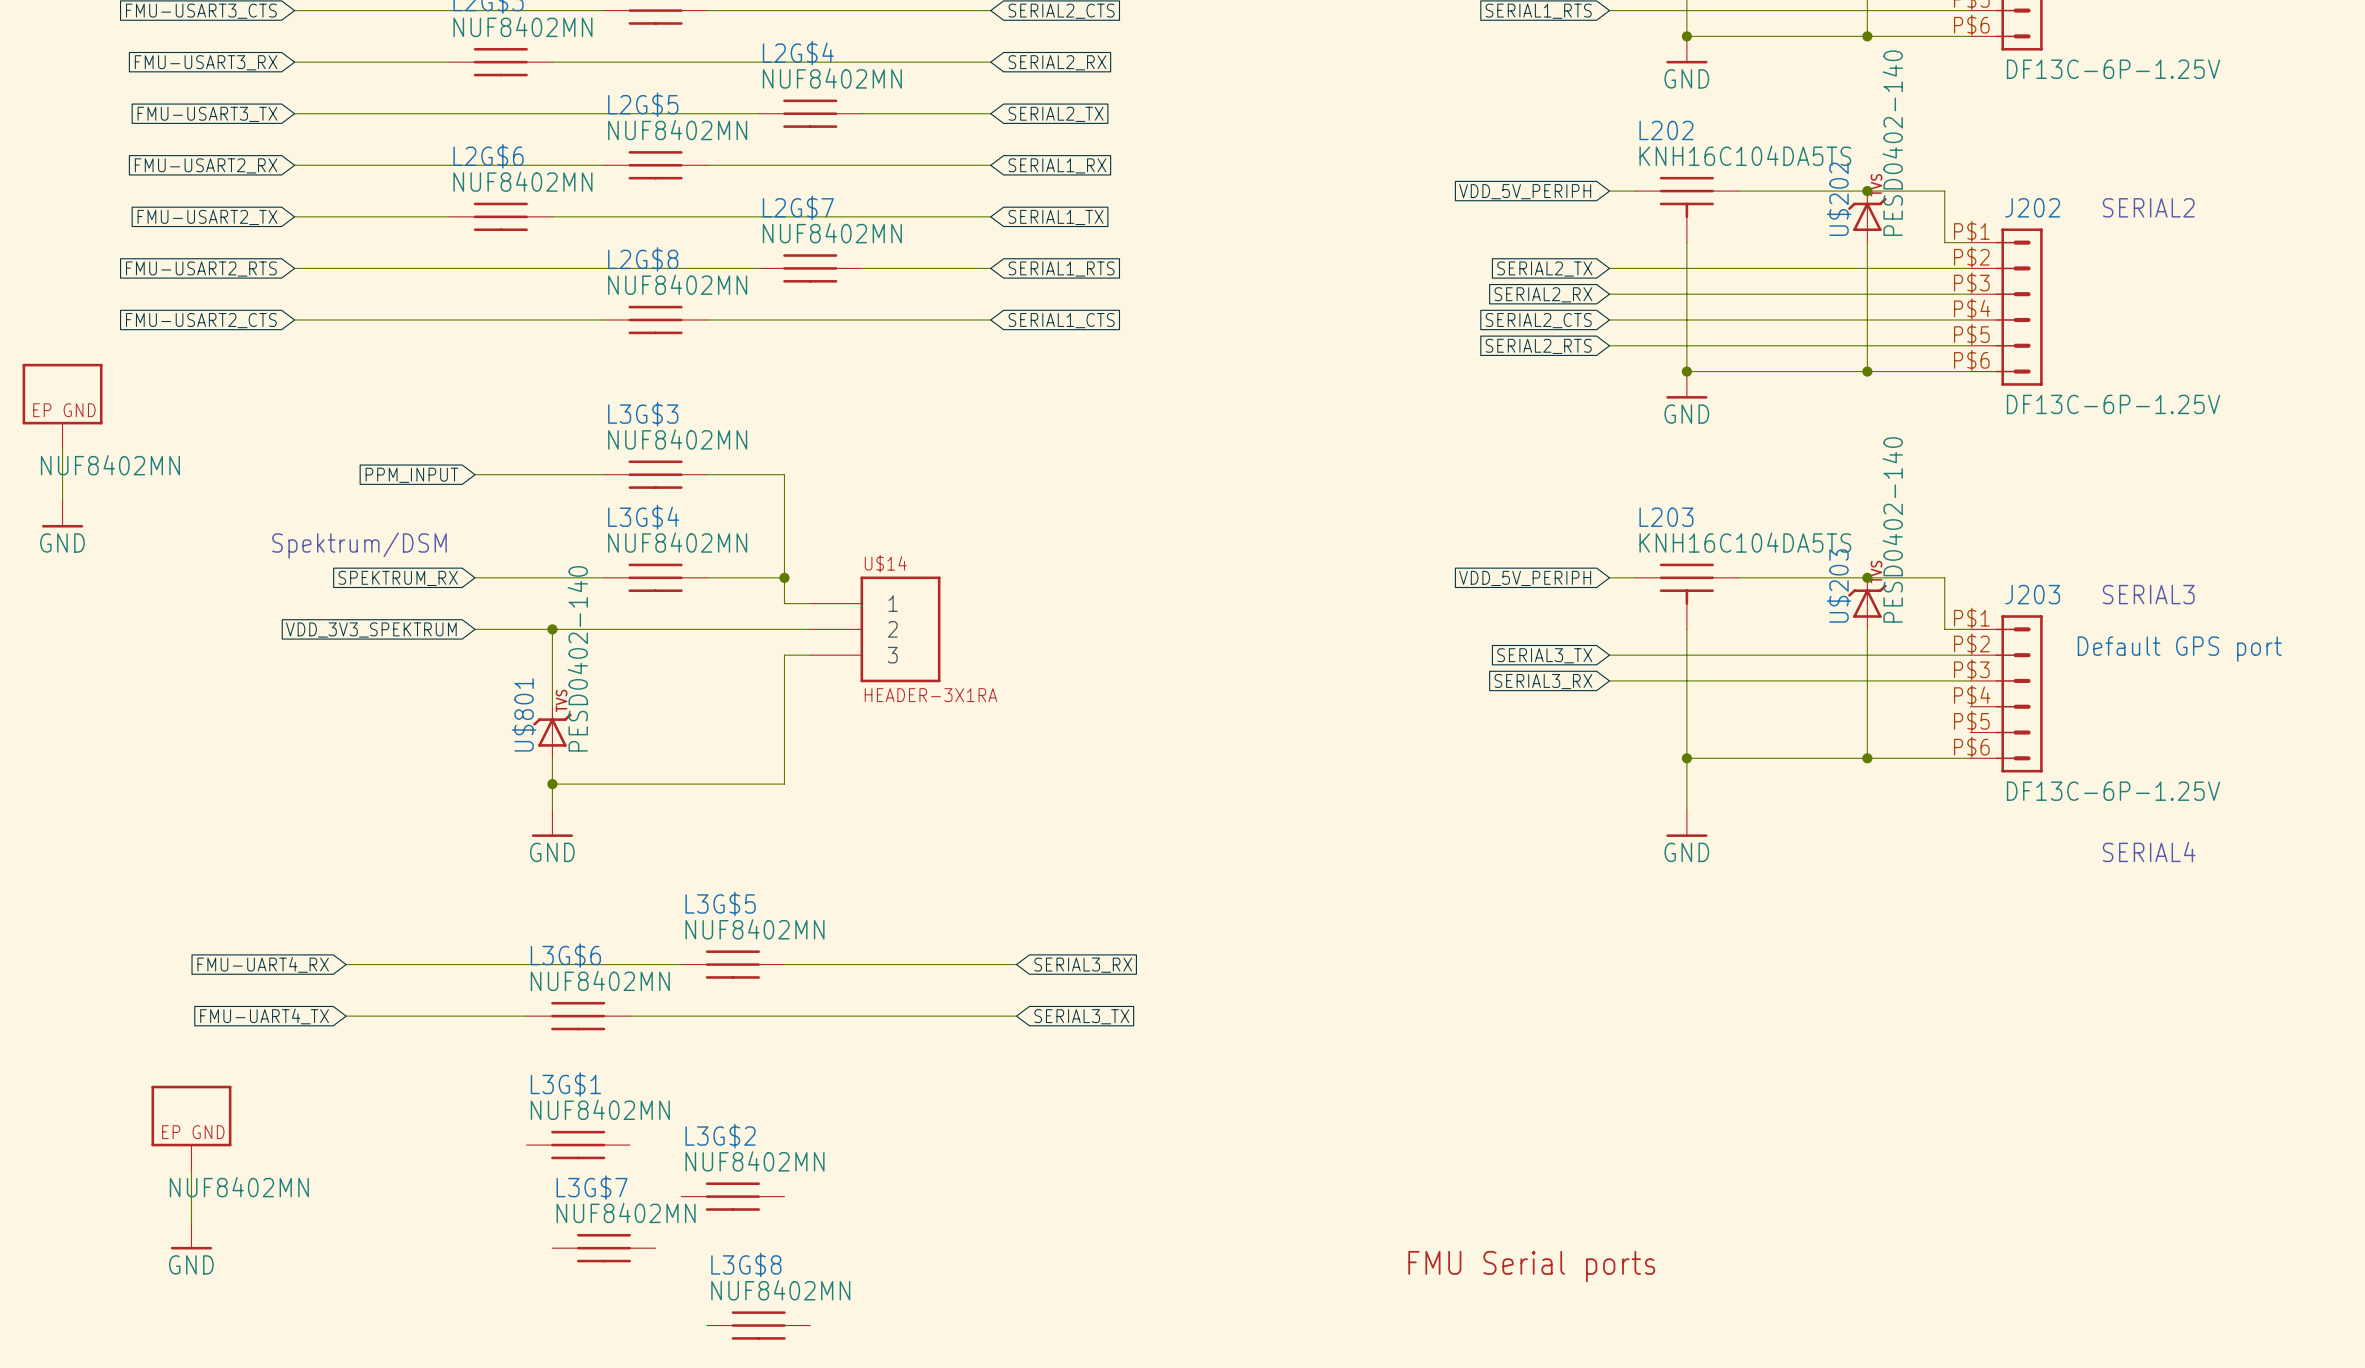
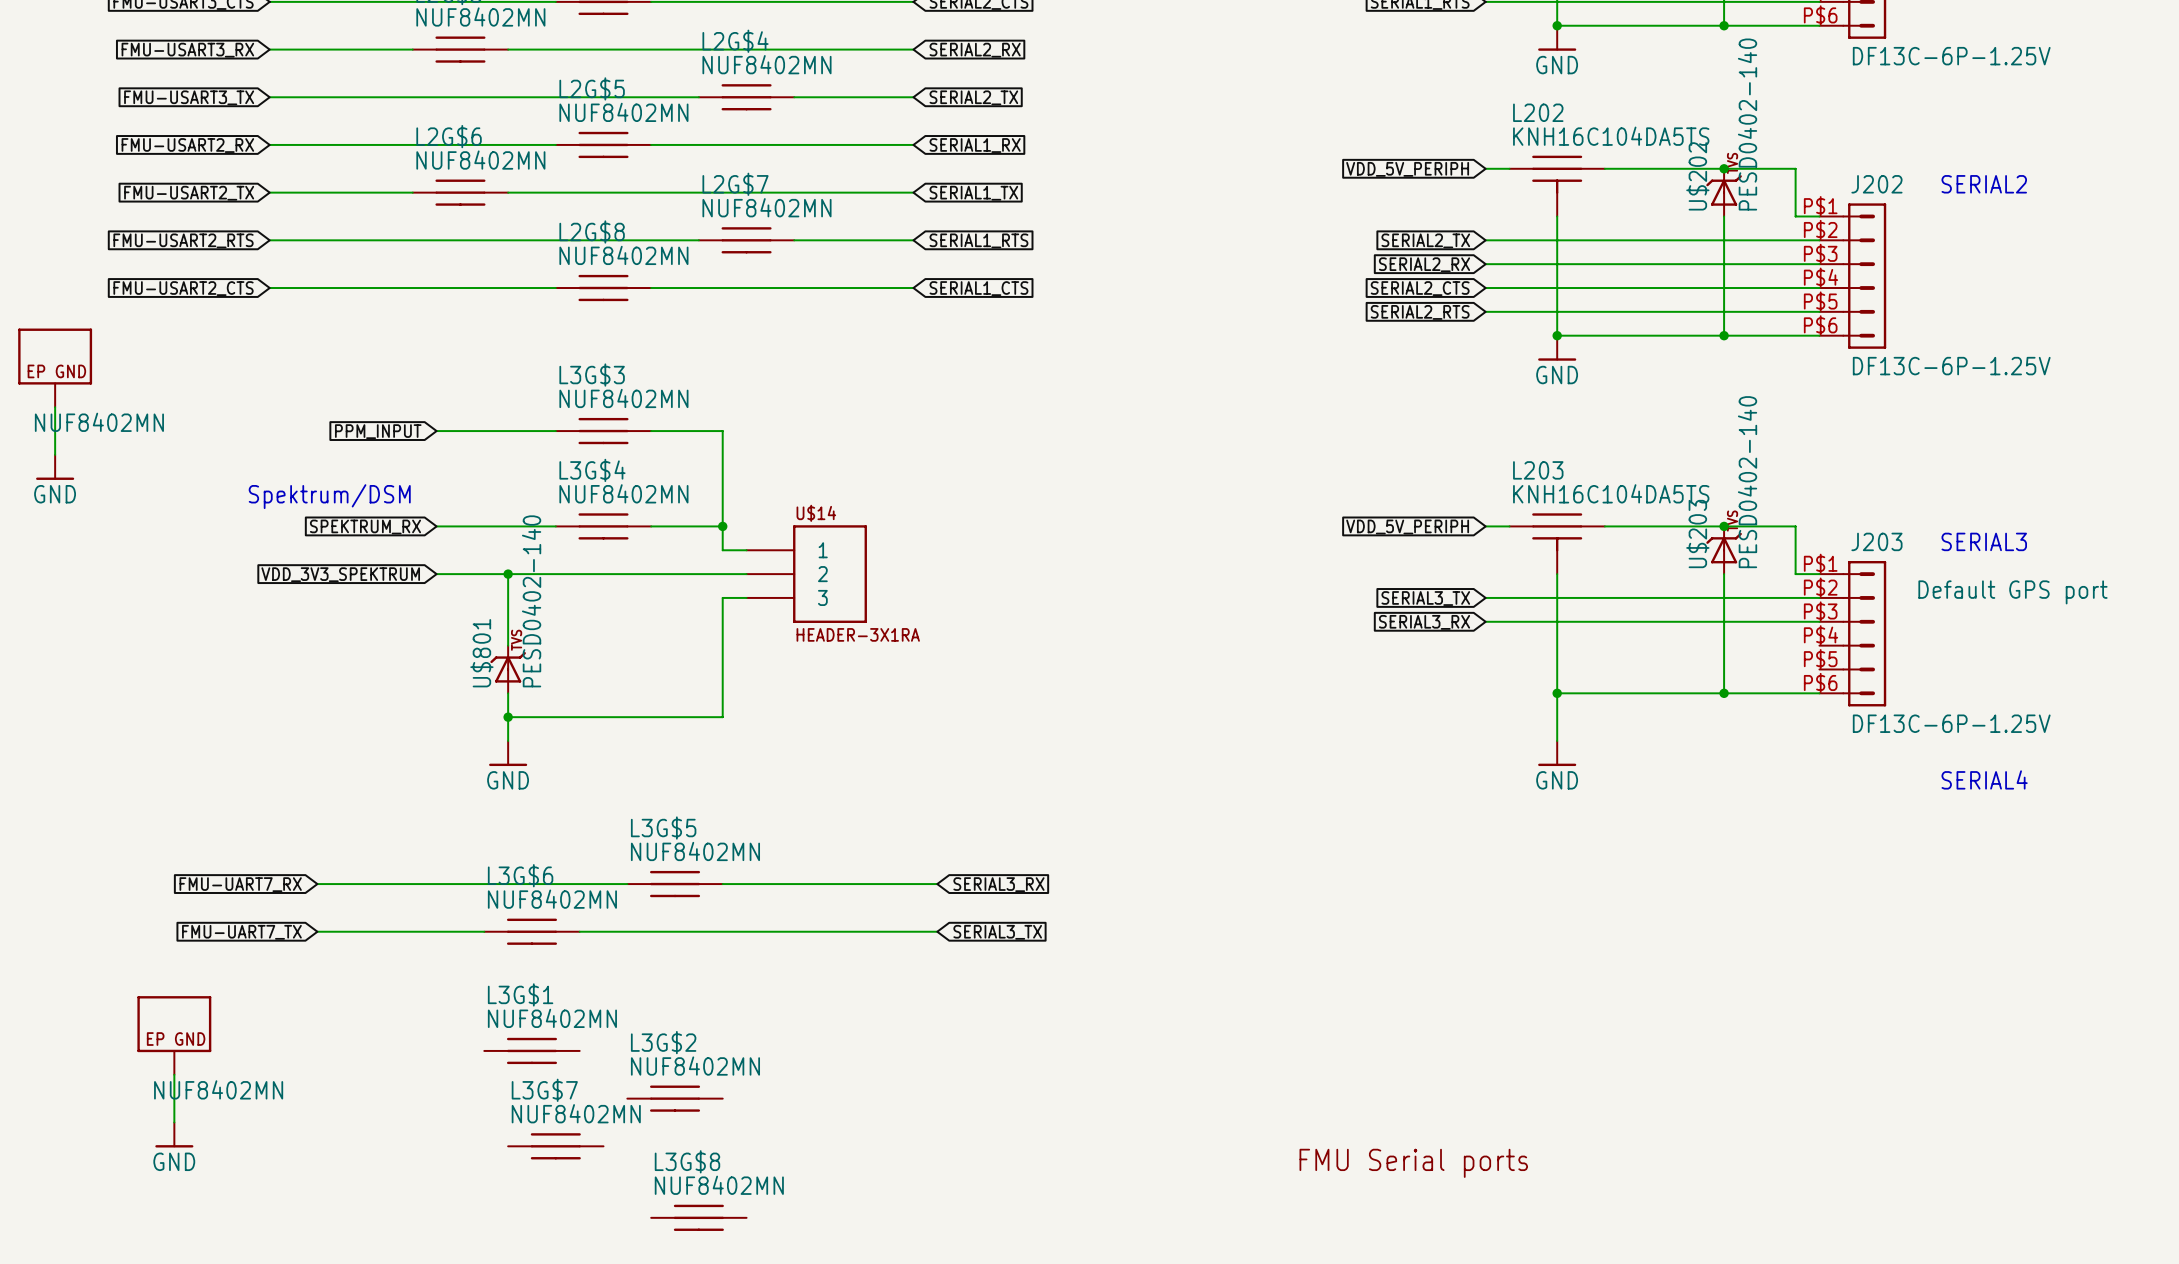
global label: FMU-UART4_RX (263, 964) -> FMU-UART7_RX (240, 884)
global label: FMU-UART4_TX (264, 1016) -> FMU-UART7_TX (241, 932)

